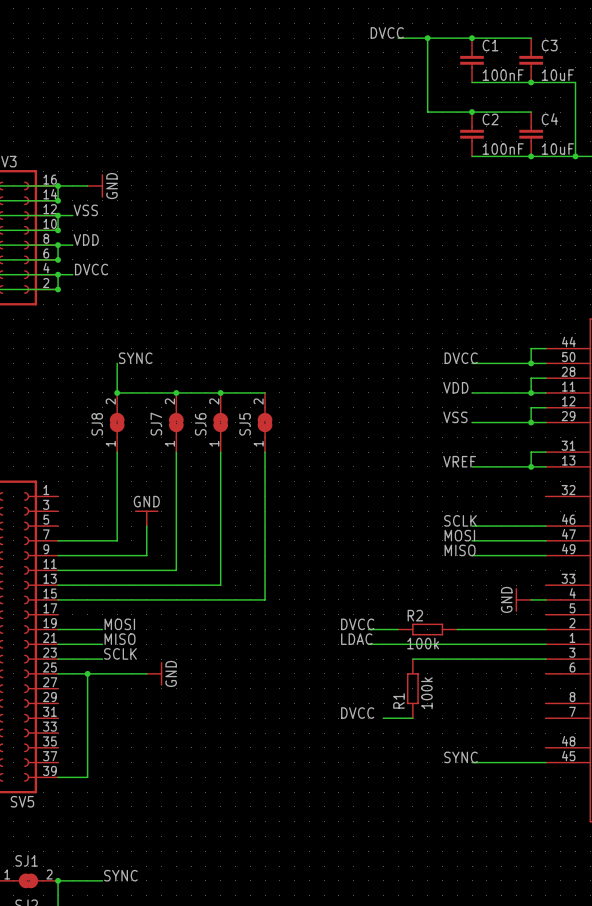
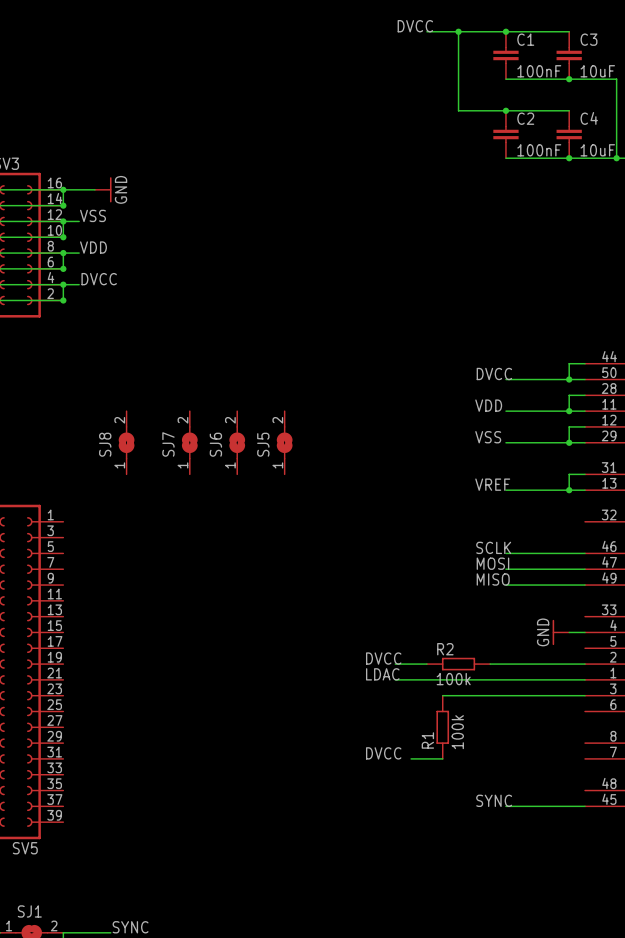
label: SYNC (135, 358) -> none
wire: (117, 363) (117, 392) (265, 392) -> none
junction: (117, 392) -> none
junction: (176, 392) -> none
junction: (220, 392) -> none
wire: (117, 452) (117, 540) (58, 540) -> none
wire: (176, 452) (176, 570) (58, 570) -> none
wire: (220, 452) (220, 585) (58, 585) -> none
wire: (265, 452) (265, 599) (58, 599) -> none
power symbol: GND (146, 518) -> none
wire: (146, 526) (146, 555) (58, 555) -> none
label: MOSI (119, 624) -> none
wire: (58, 629) (102, 629) -> none
label: MISO (120, 639) -> none
wire: (58, 644) (102, 644) -> none
label: SCLK (120, 653) -> none
wire: (58, 659) (102, 659) -> none
wire: (58, 673) (146, 673) -> none
wire: (87, 673) (87, 777) (58, 777) -> none
junction: (87, 673) -> none
power symbol: GND (154, 673) -> none
junction: (58, 880) -> none

